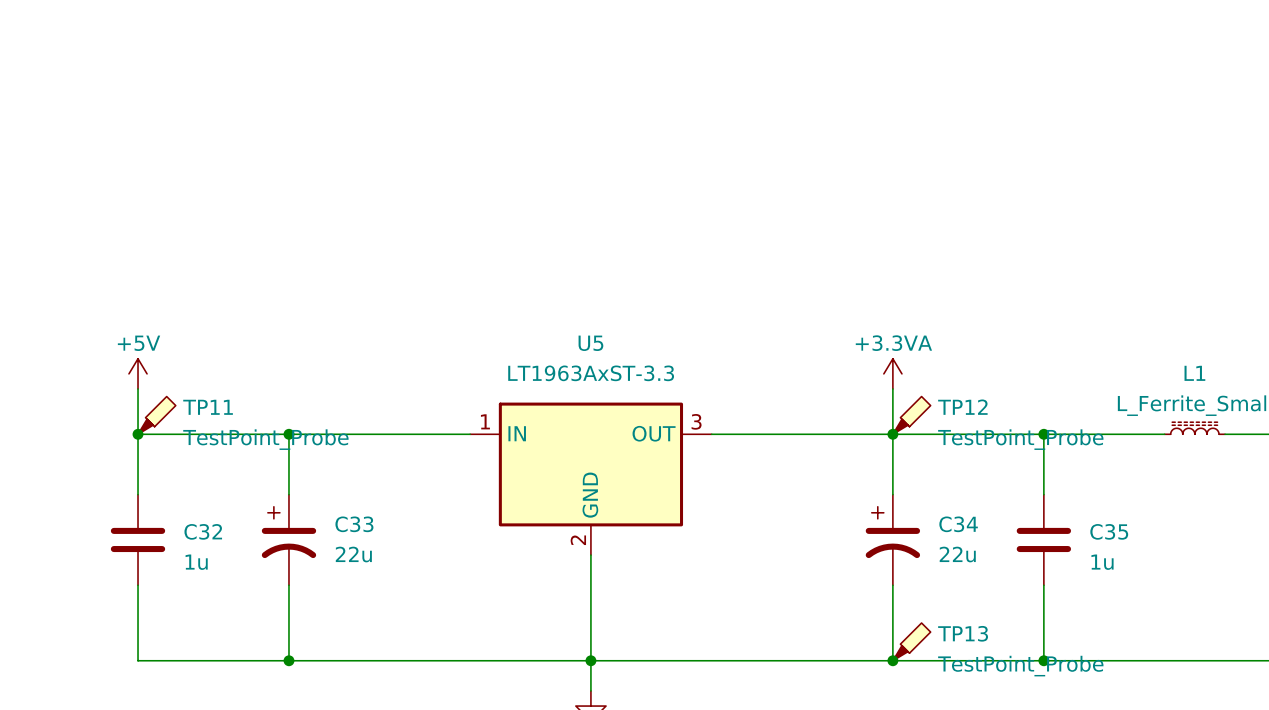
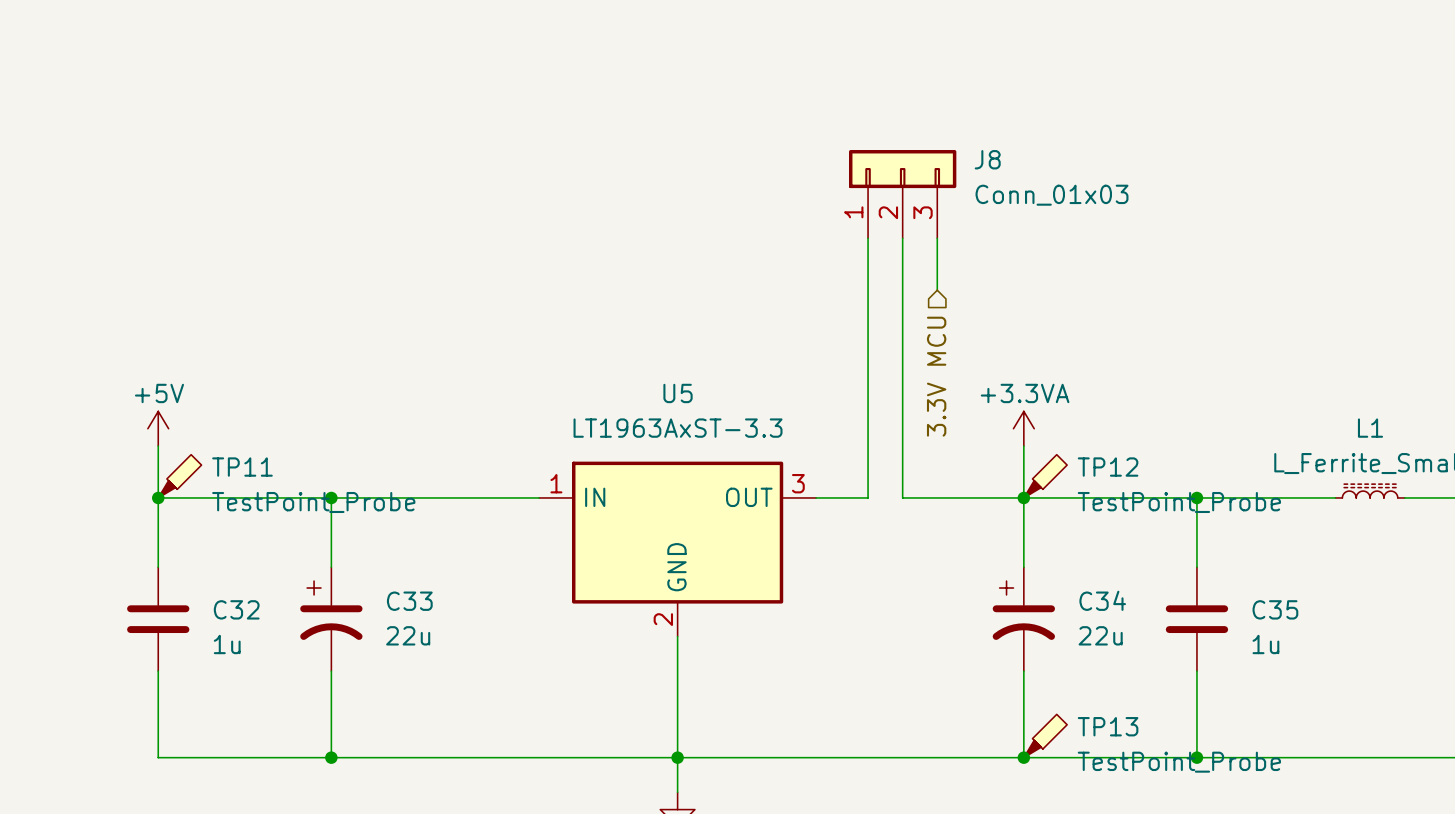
J8: none -> Conn_01x03 (902, 194)
wire: none -> (902, 238) (902, 497)
wire: none -> (937, 238) (937, 290)
hierarchical label: none -> 3.3V MCU (936, 376)
wire: (757, 434) (787, 434) -> (868, 497) (868, 238)

